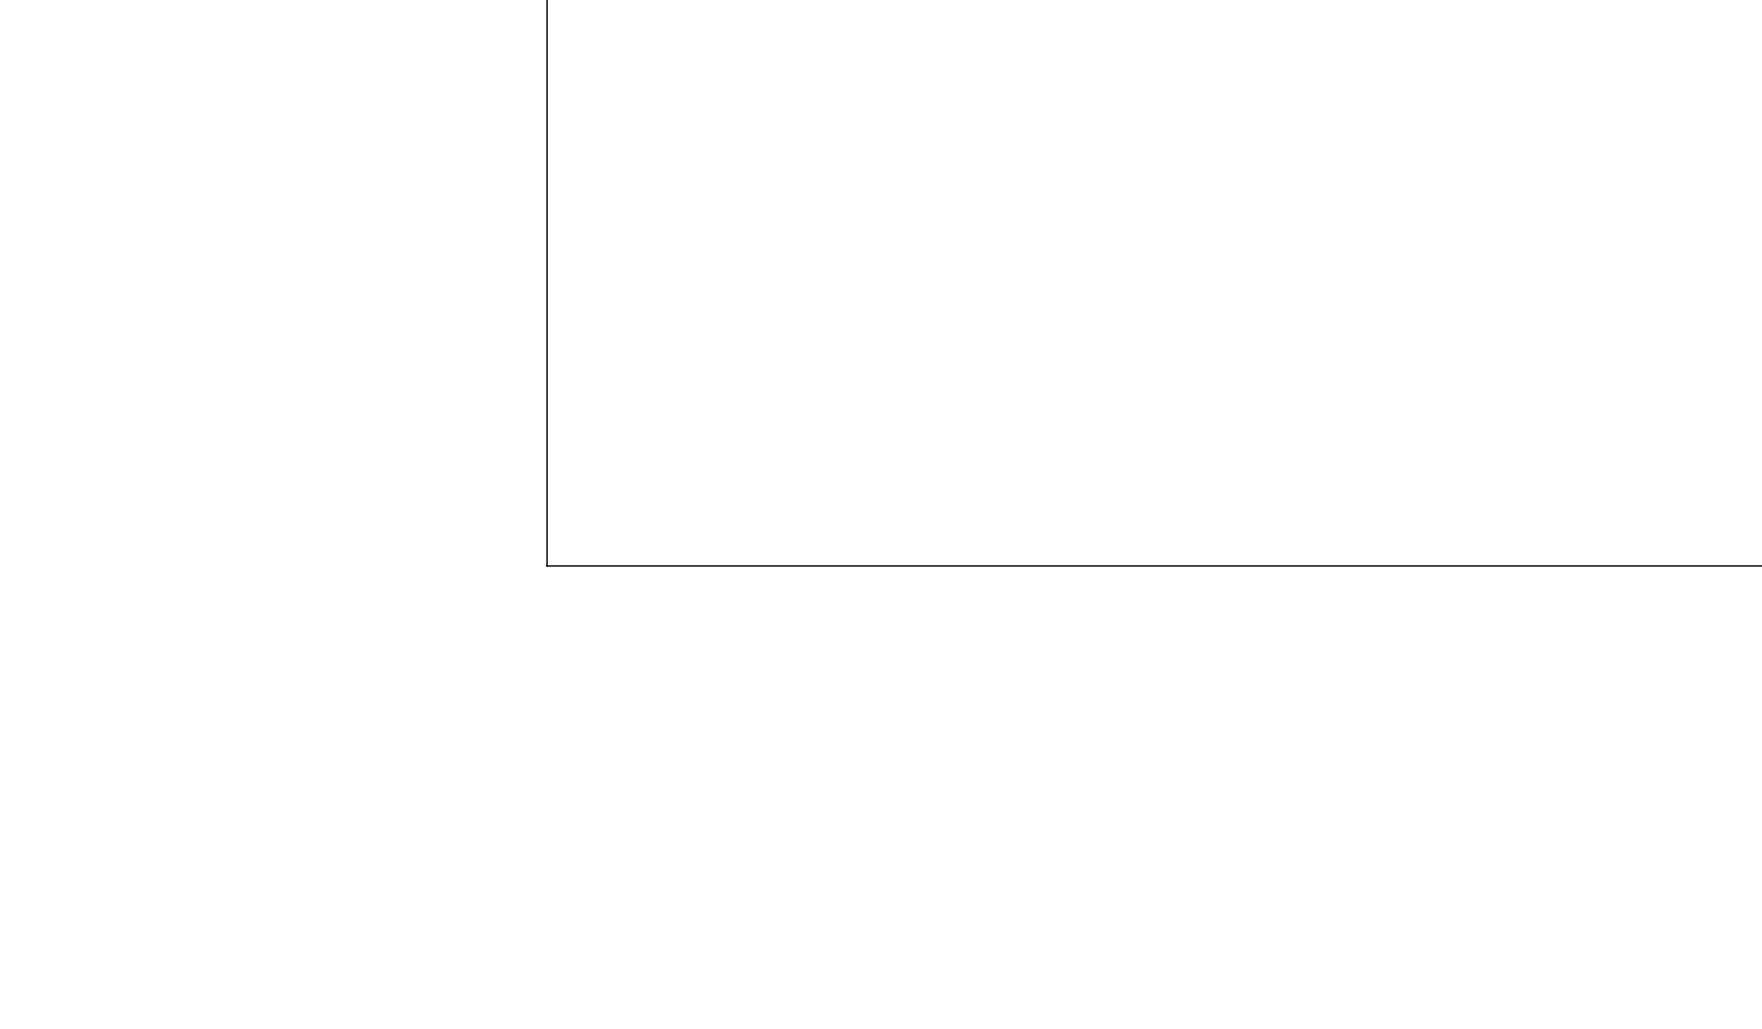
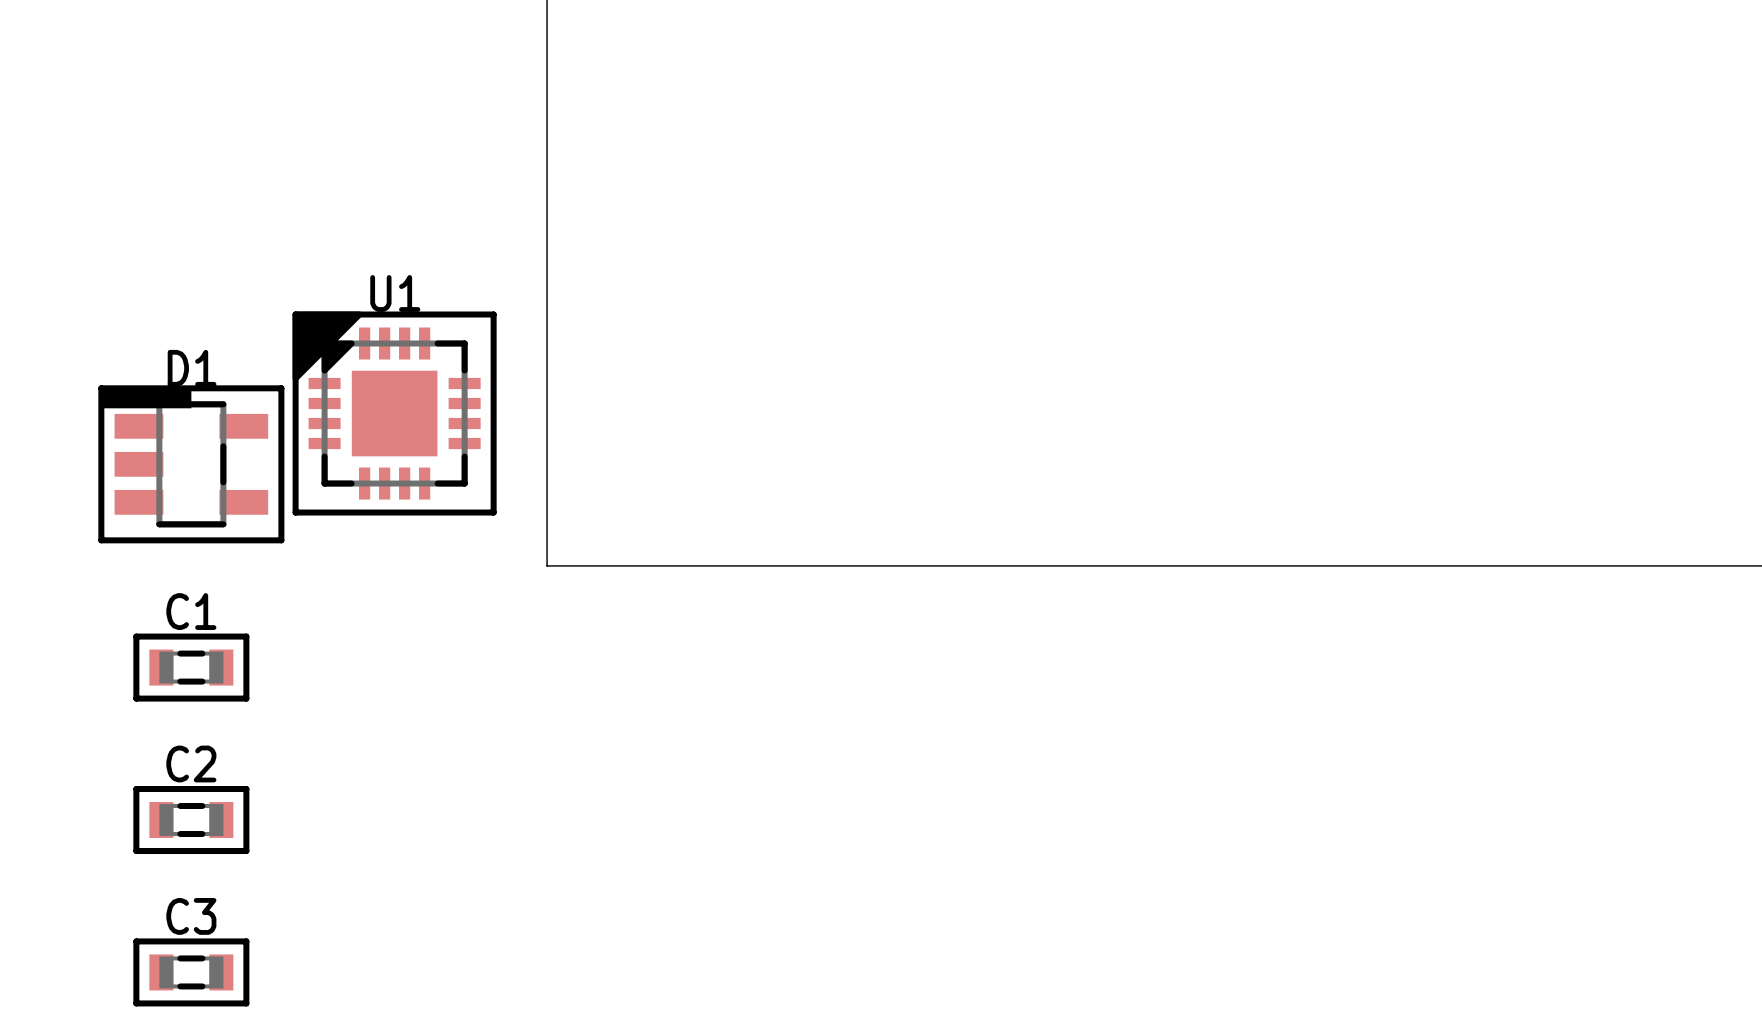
U1: none -> (394, 413)
D1: none -> (191, 464)
C1: none -> (191, 667)
C2: none -> (191, 820)
C3: none -> (191, 972)

